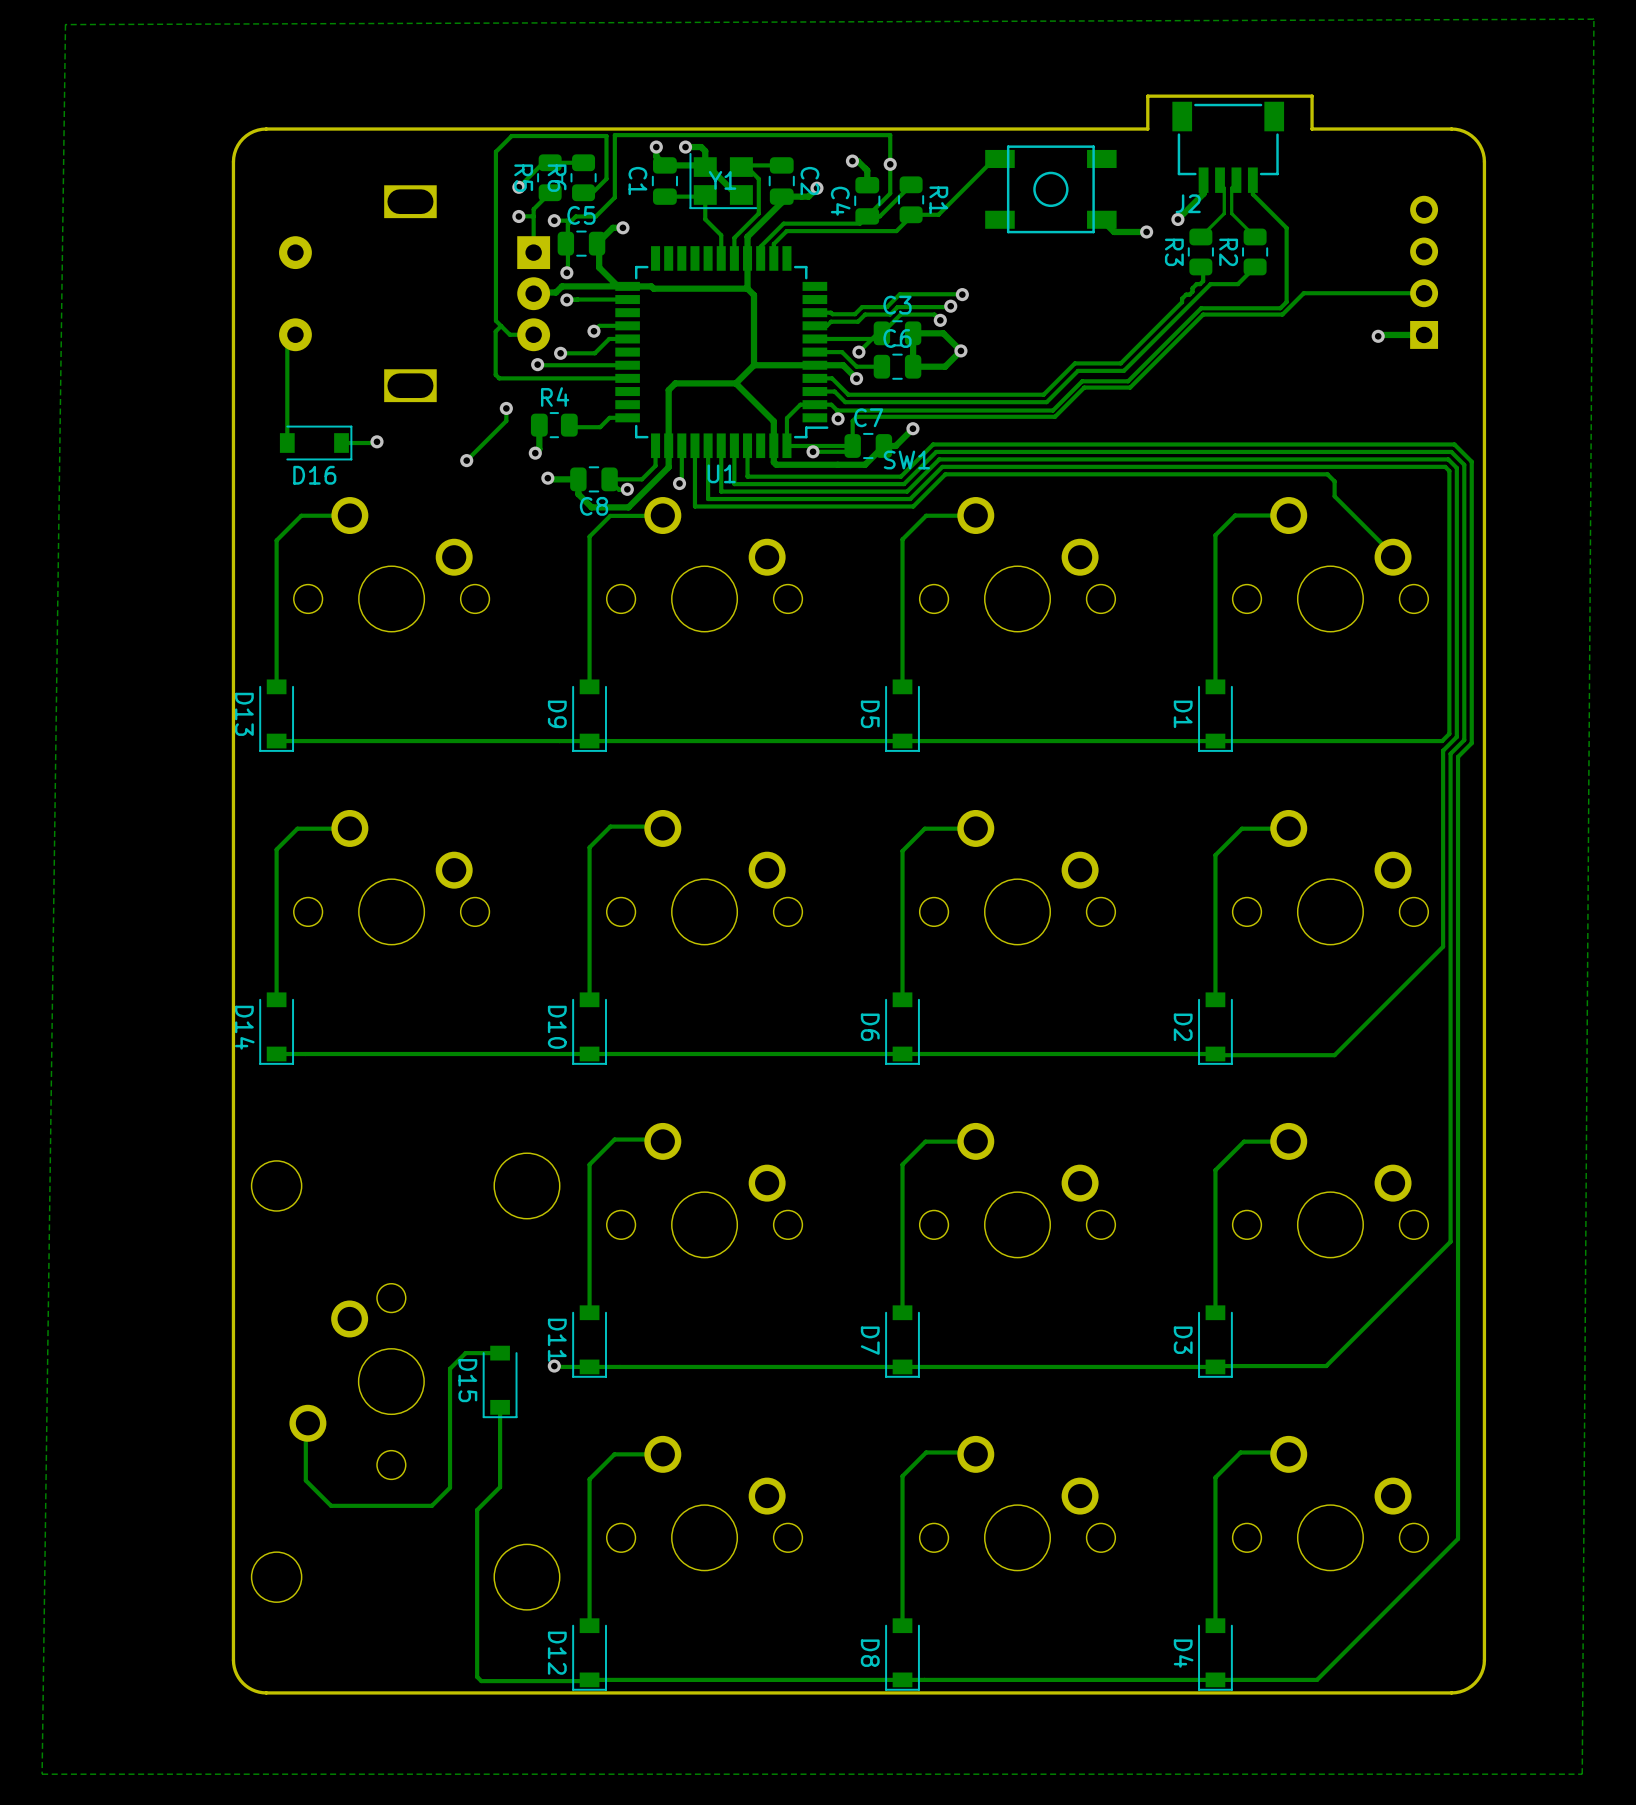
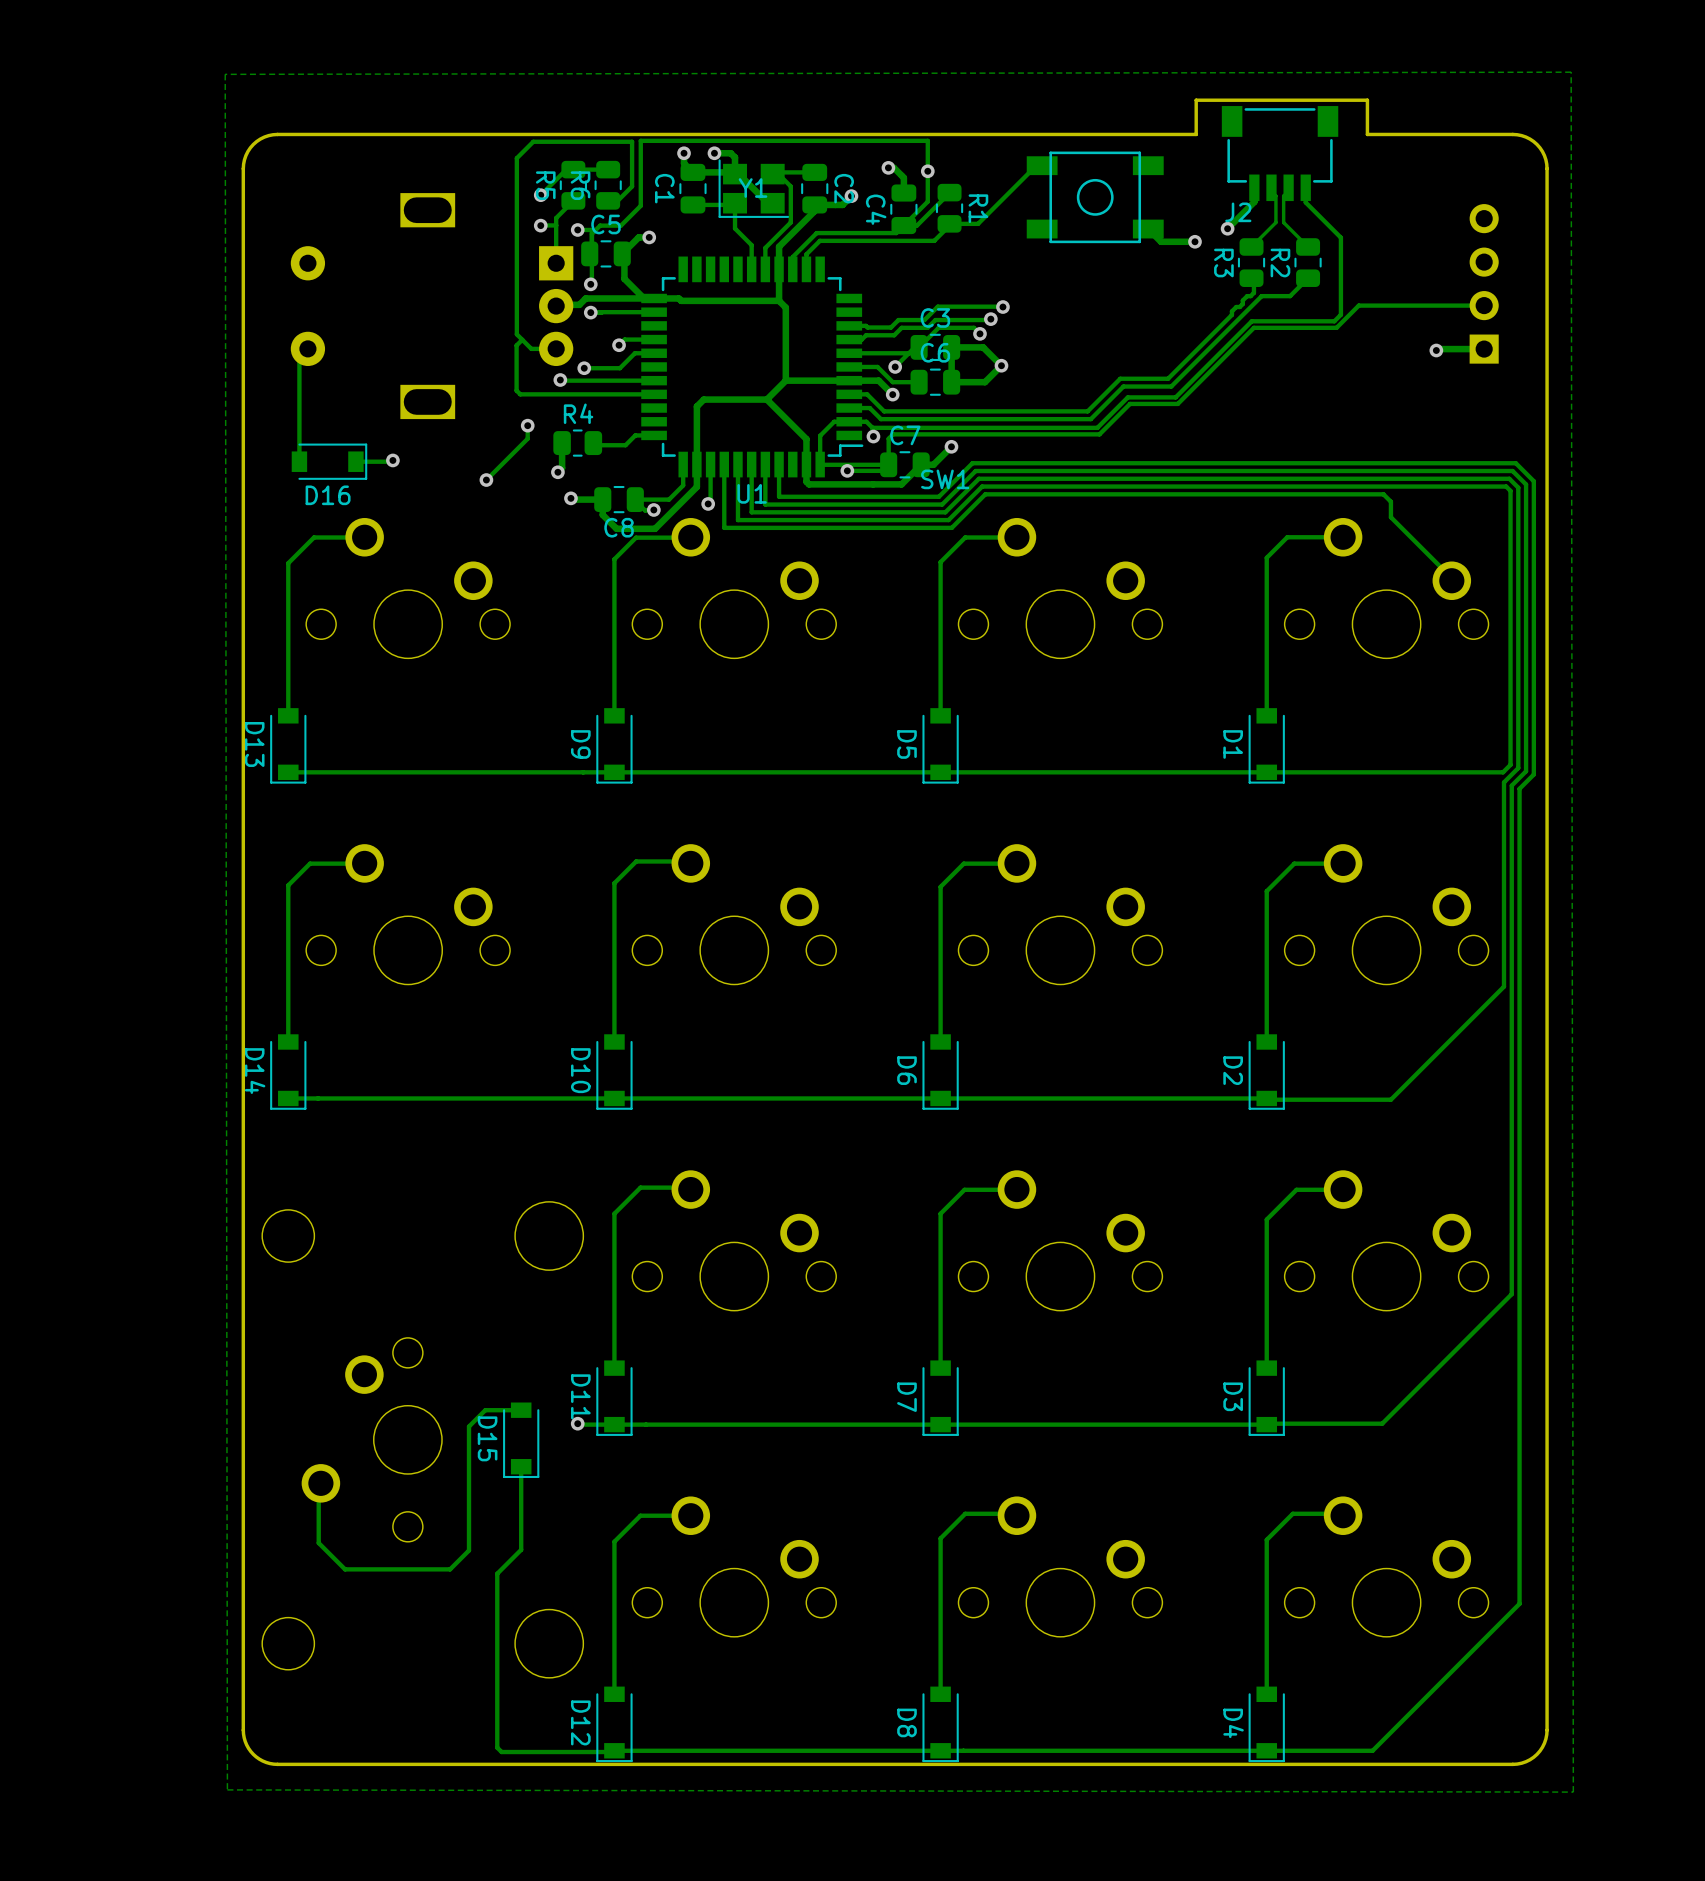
zone outline: (1593, 18) (1582, 1774) (42, 1774) (65, 24) (1593, 18) -> (1571, 72) (1573, 1792) (227, 1789) (225, 74) (1571, 72)

